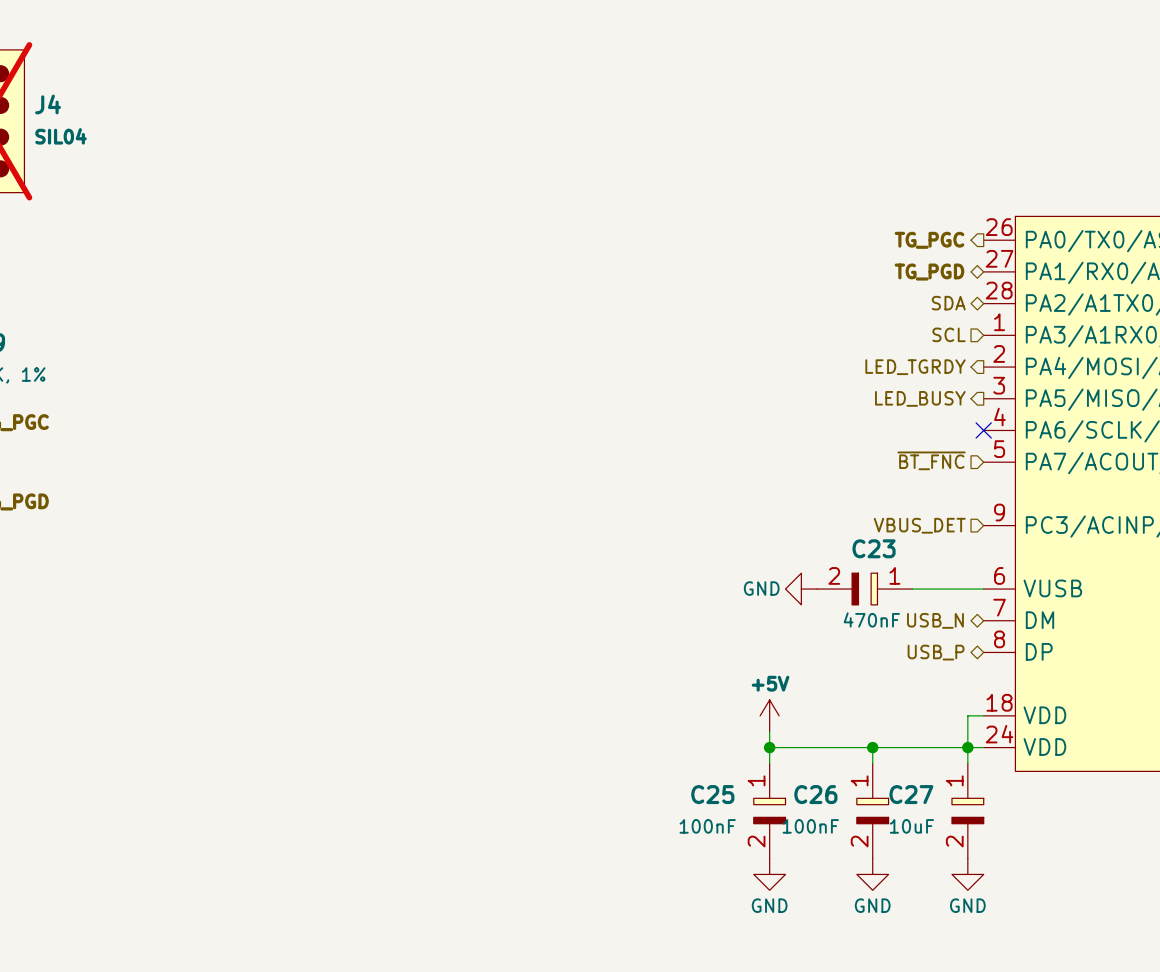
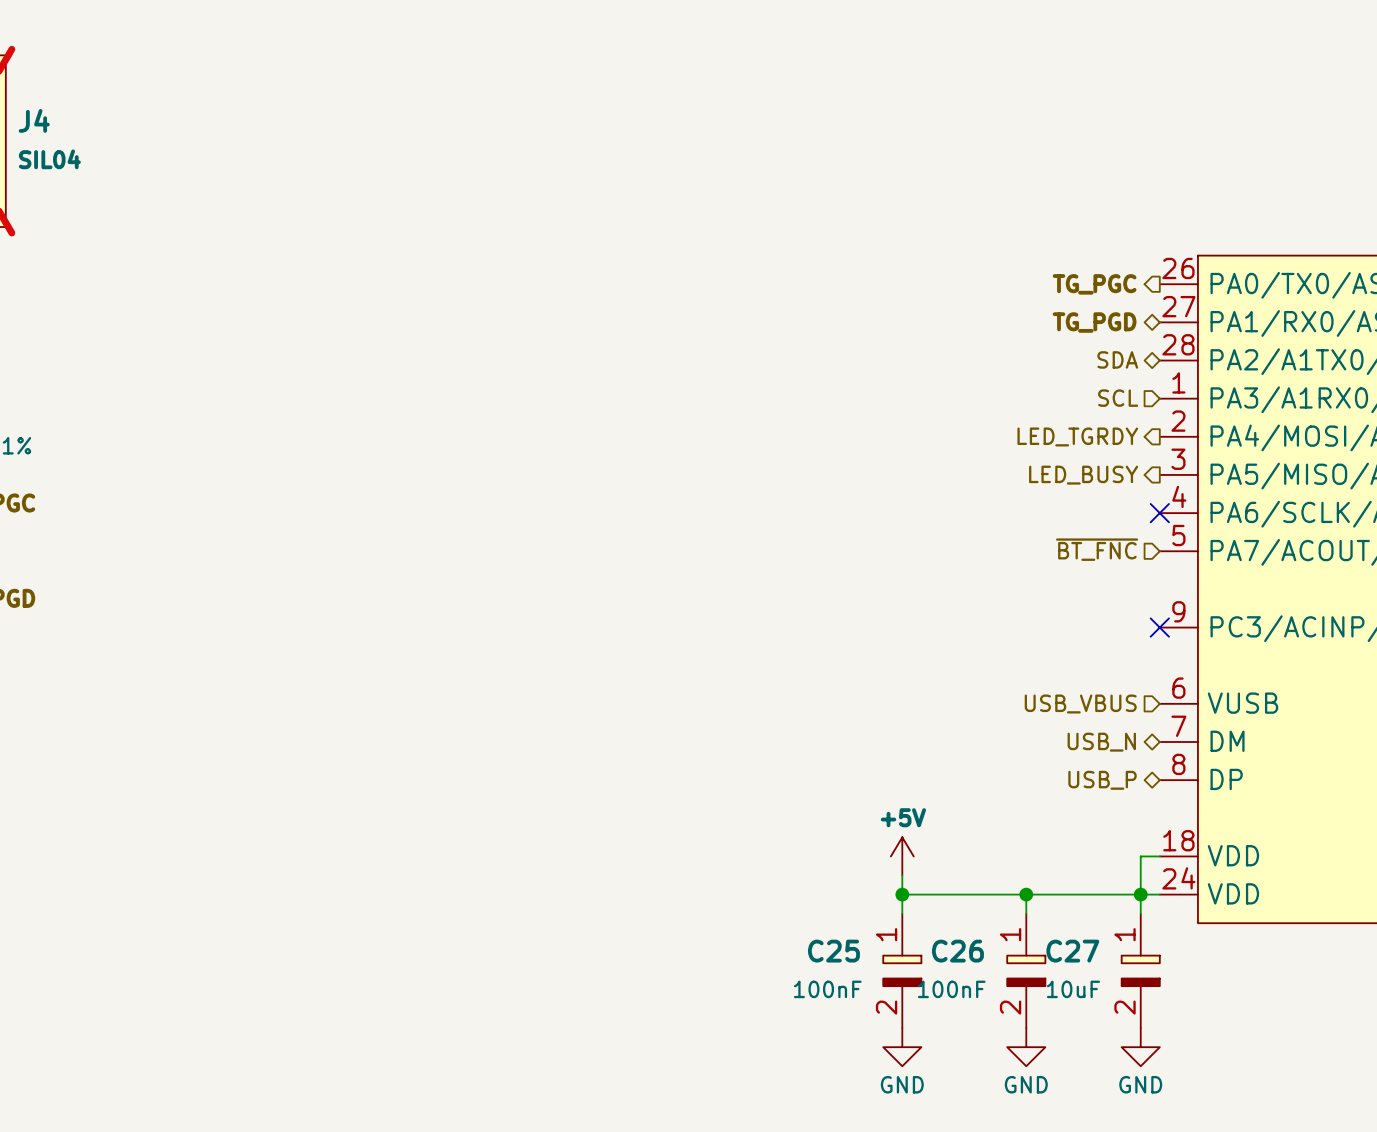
hierarchical label: VBUS_DET (919, 525) -> none
no-connect mark: none -> (1159, 627)
power symbol: GND (801, 589) -> none
C23: 470nF (864, 589) -> none
wire: (912, 589) (983, 589) -> none
hierarchical label: none -> USB_VBUS (1080, 704)

